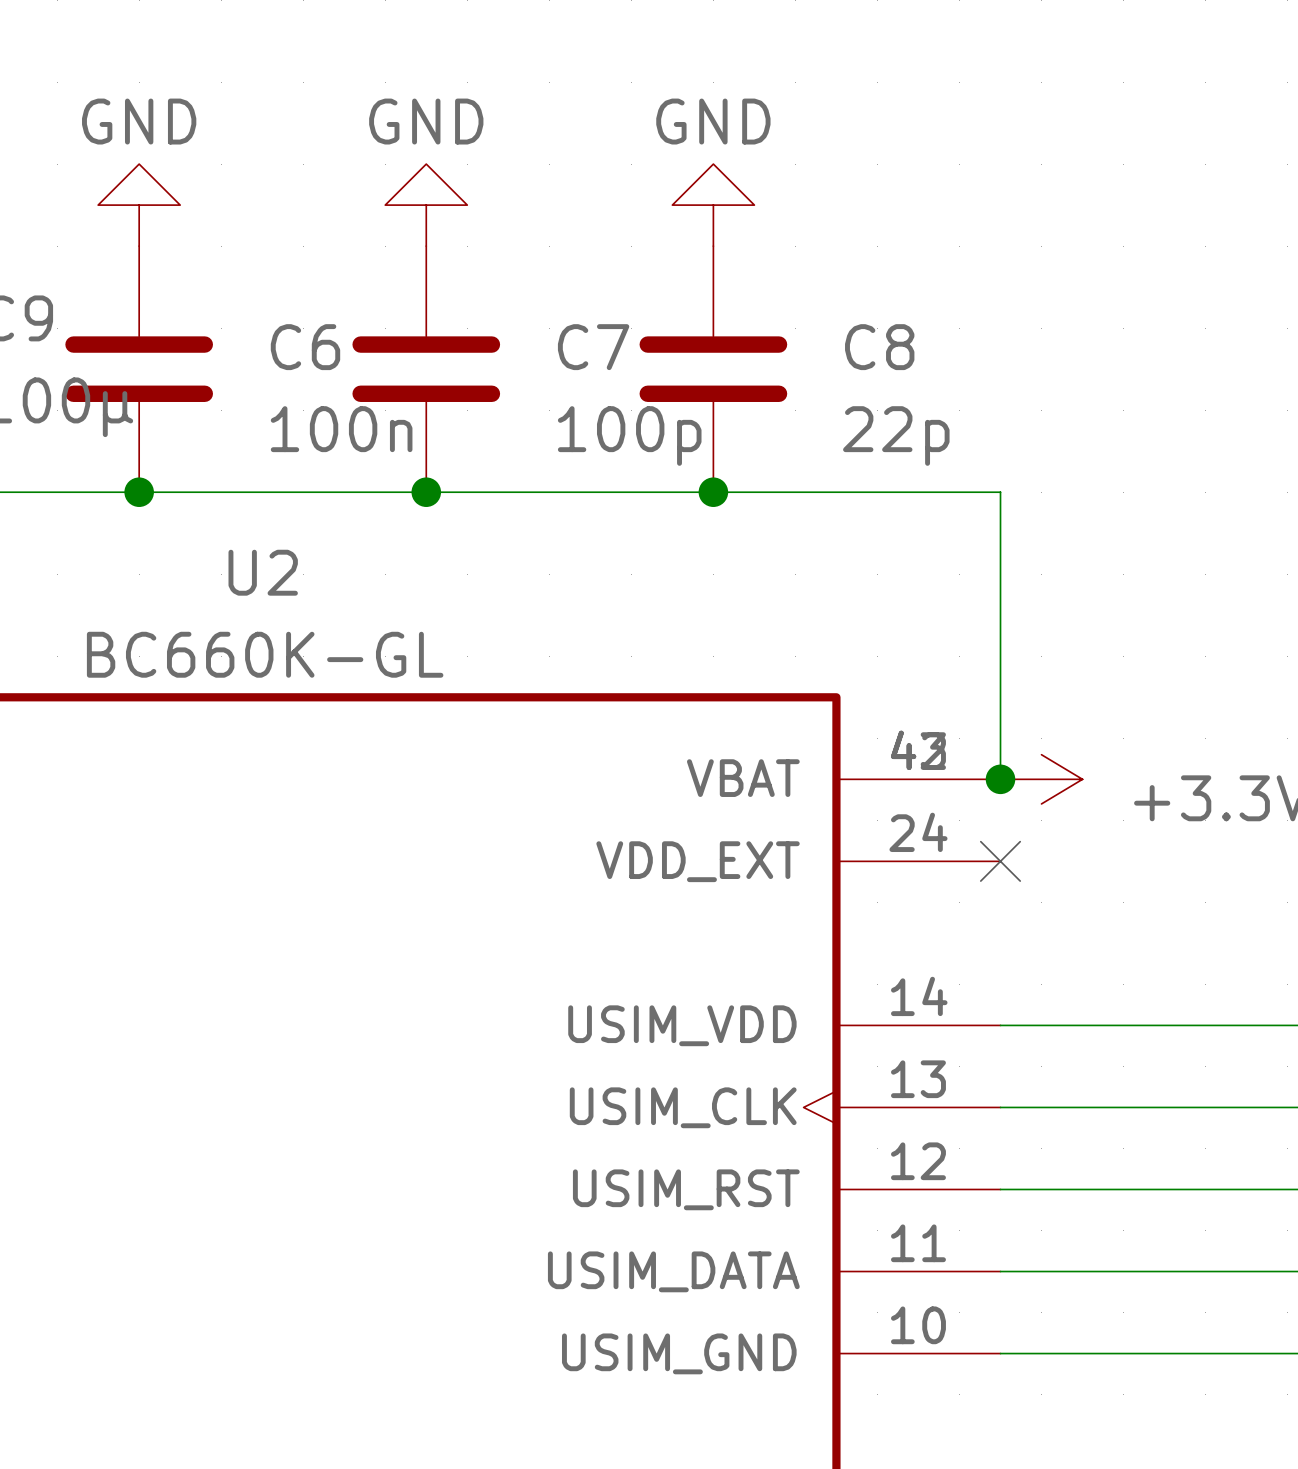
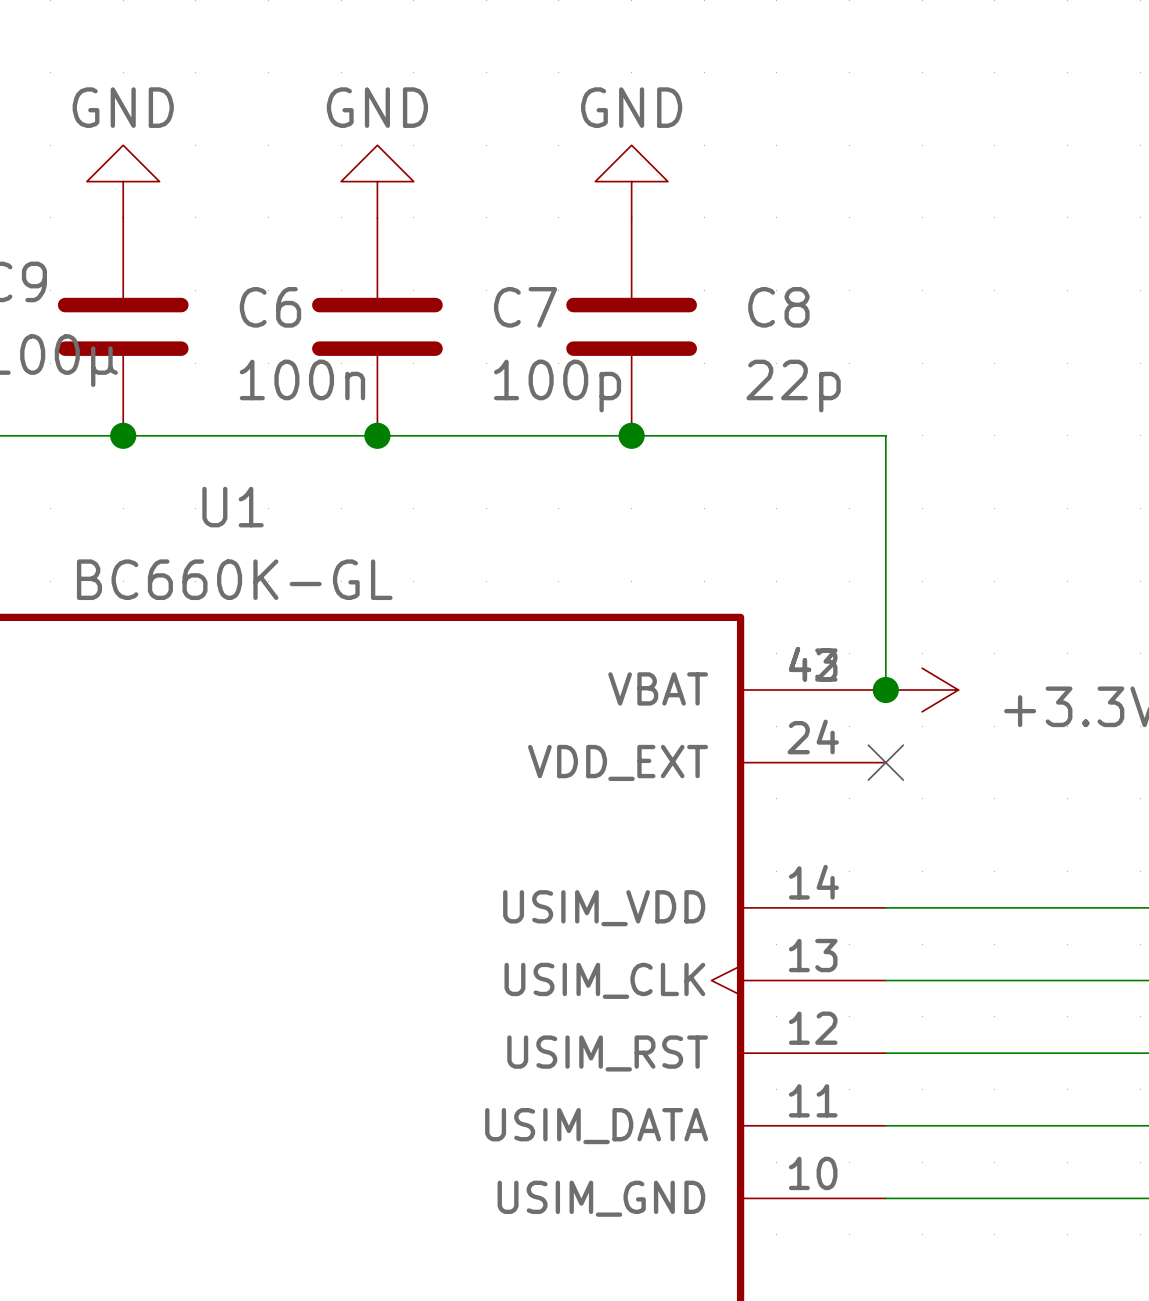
U2 name: U2 (263, 572) -> U1 (233, 507)

